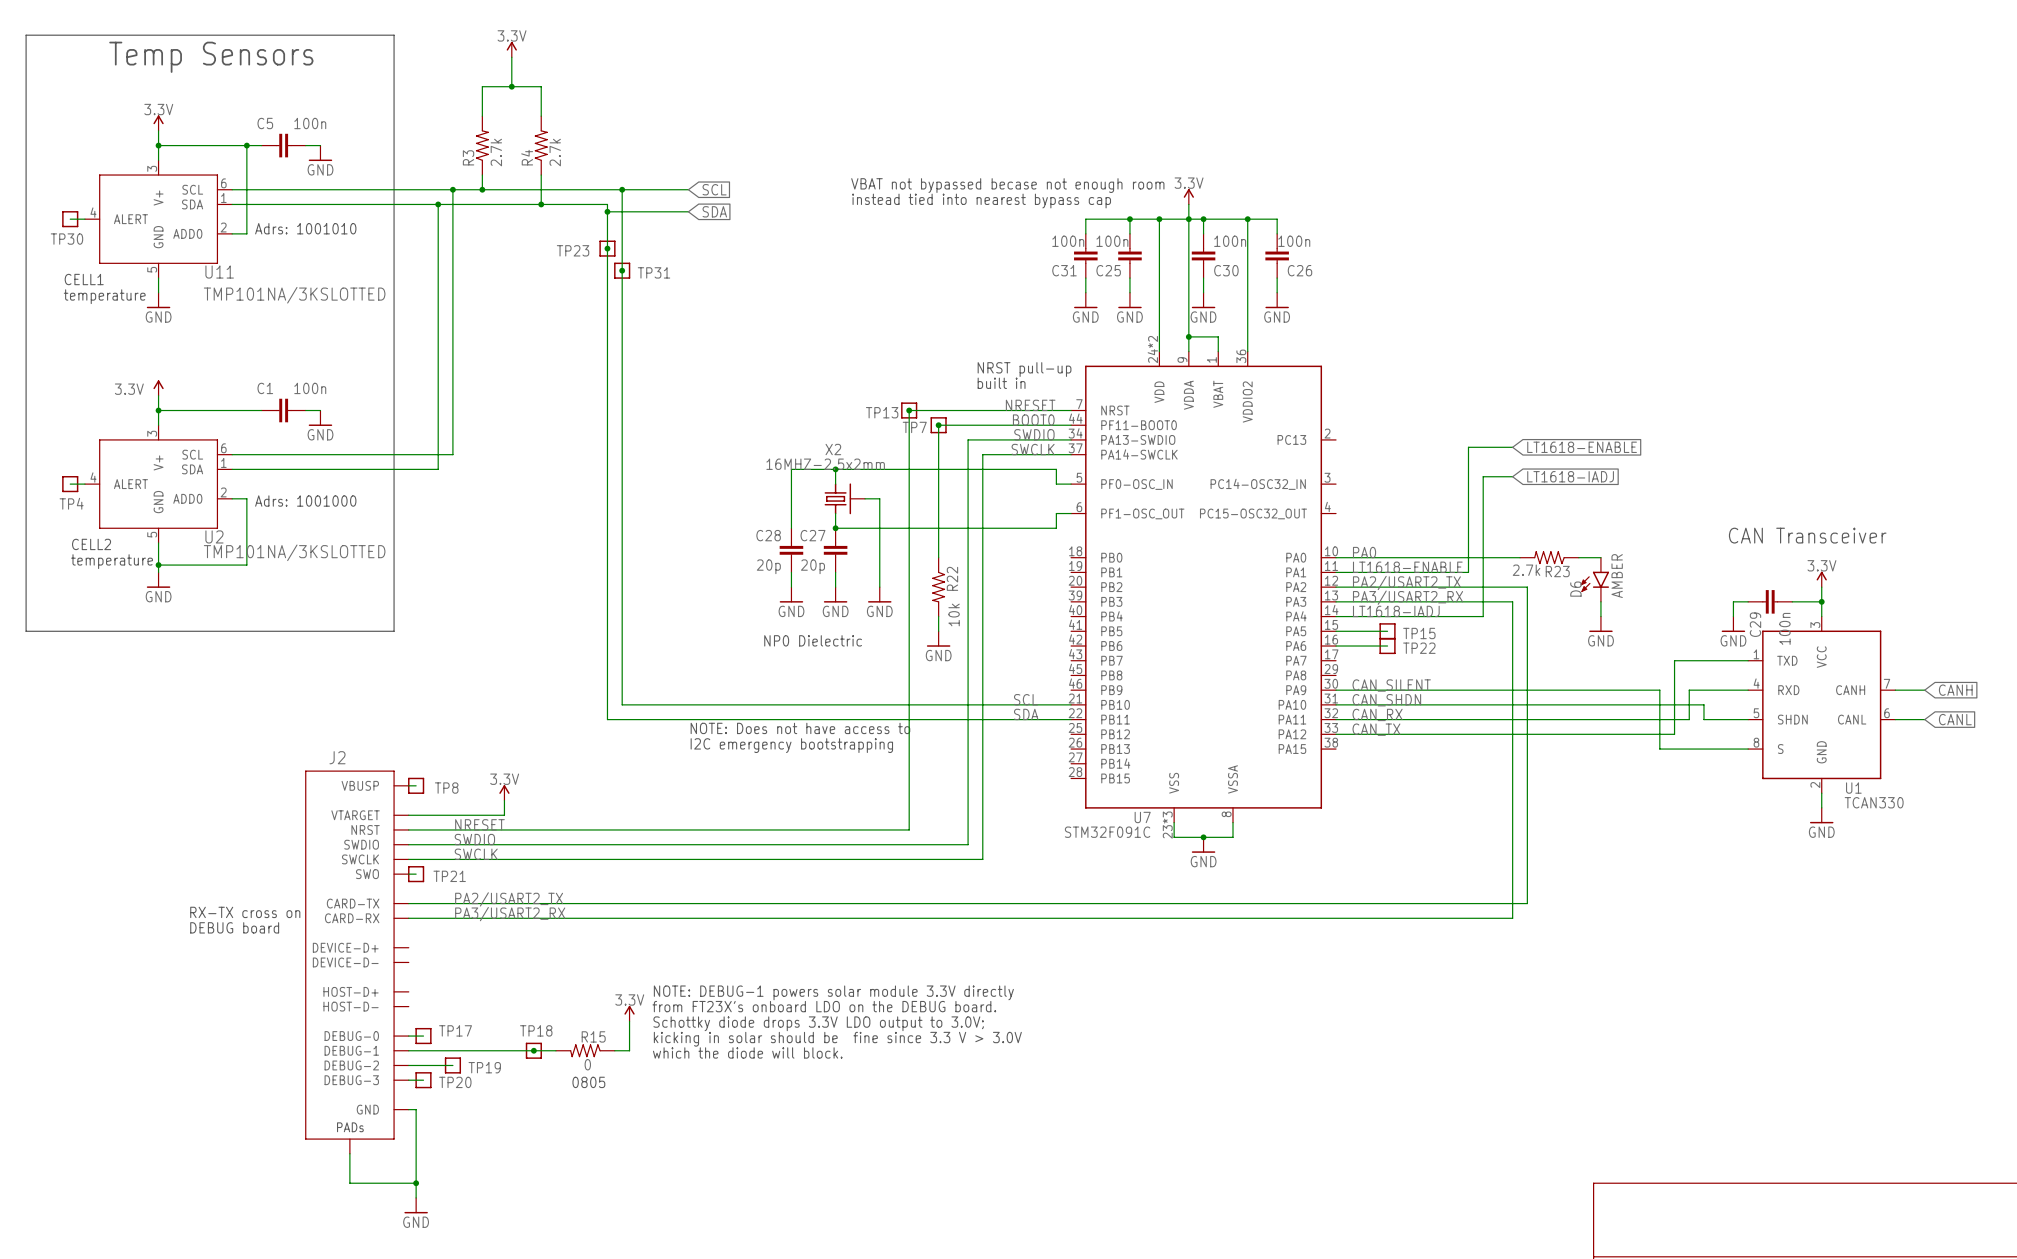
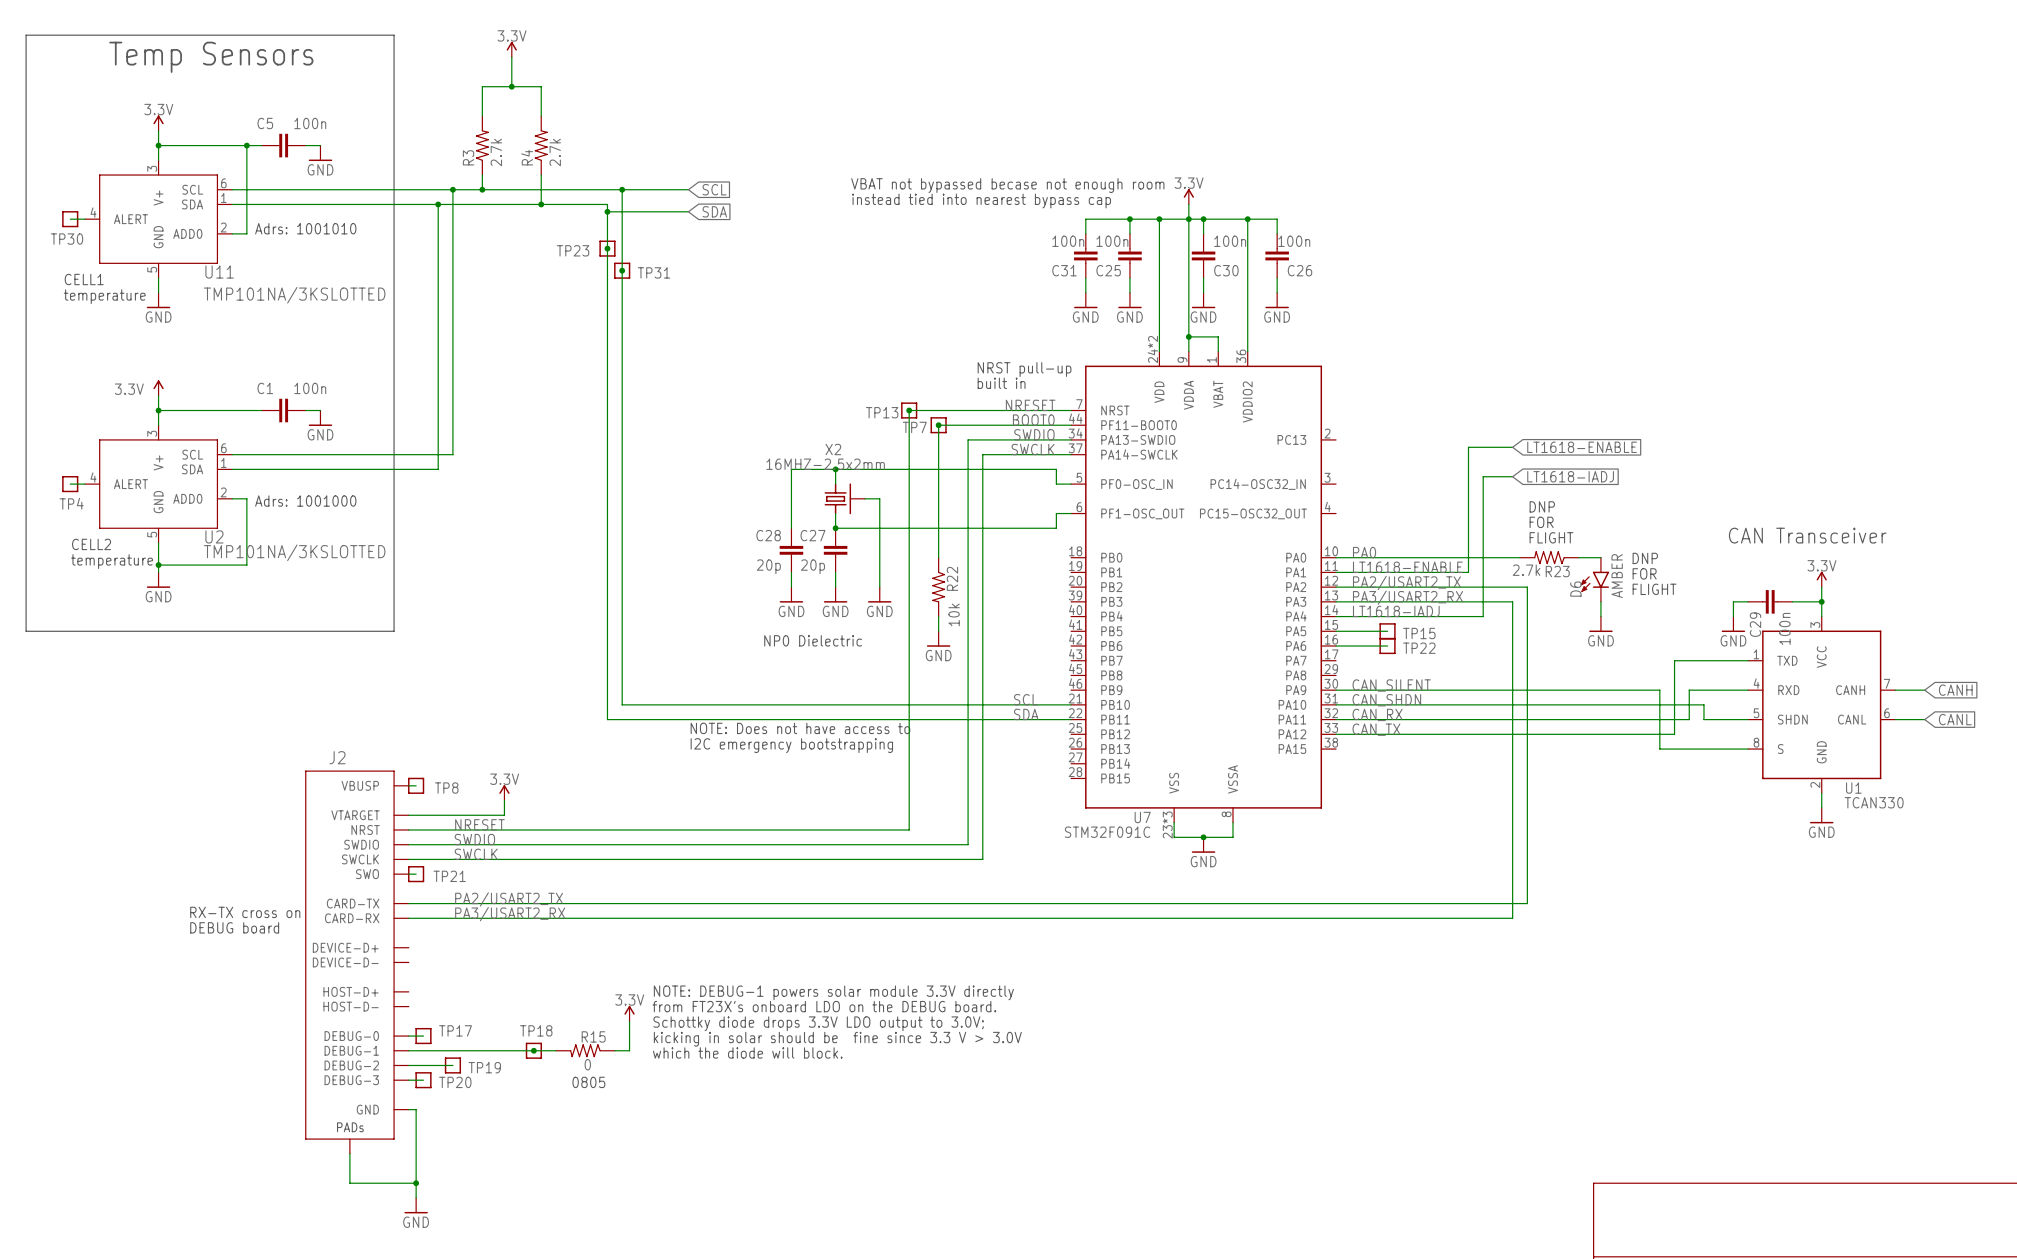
text: none -> DNP (1542, 506)
text: none -> FOR (1541, 522)
text: none -> FLIGHT (1551, 537)
text: none -> DNP (1645, 558)
text: none -> FOR (1644, 573)
text: none -> FLIGHT (1654, 589)

